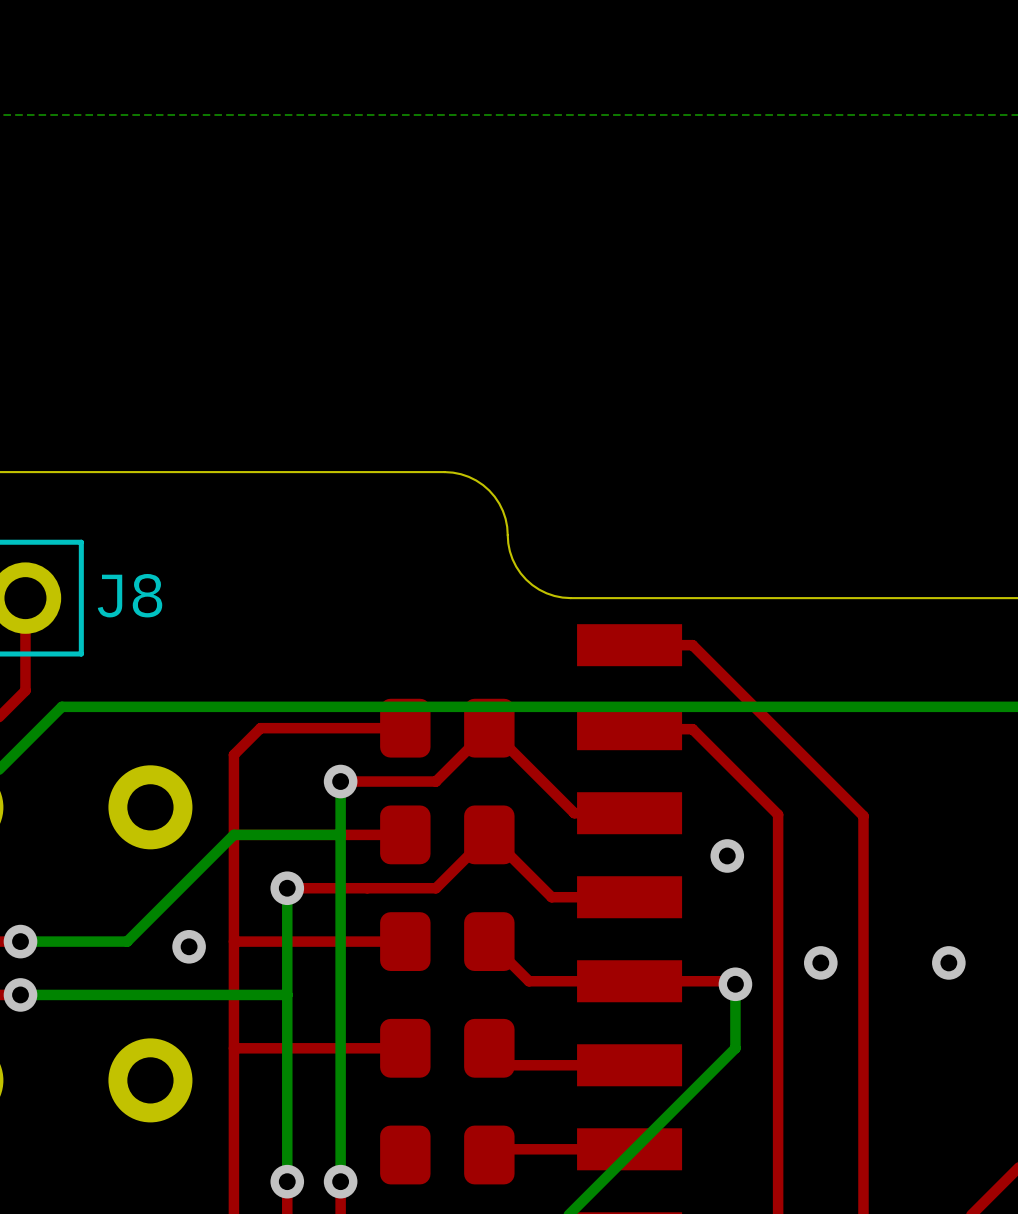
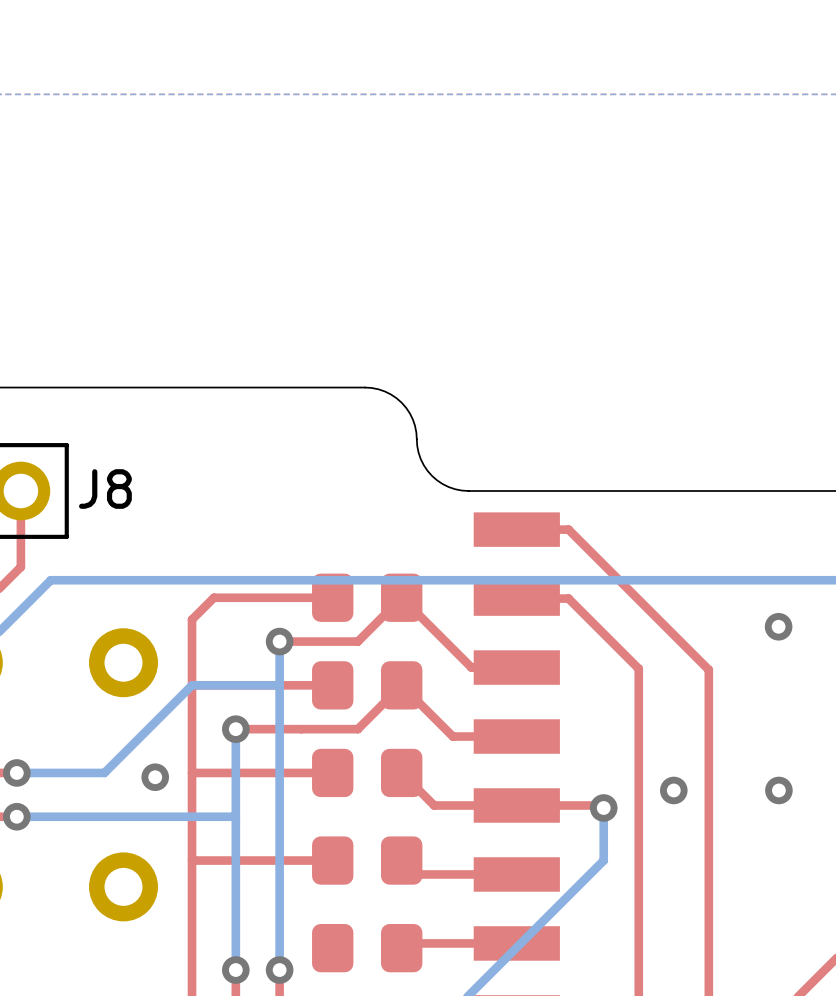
via position: (727, 855) -> (778, 626)

